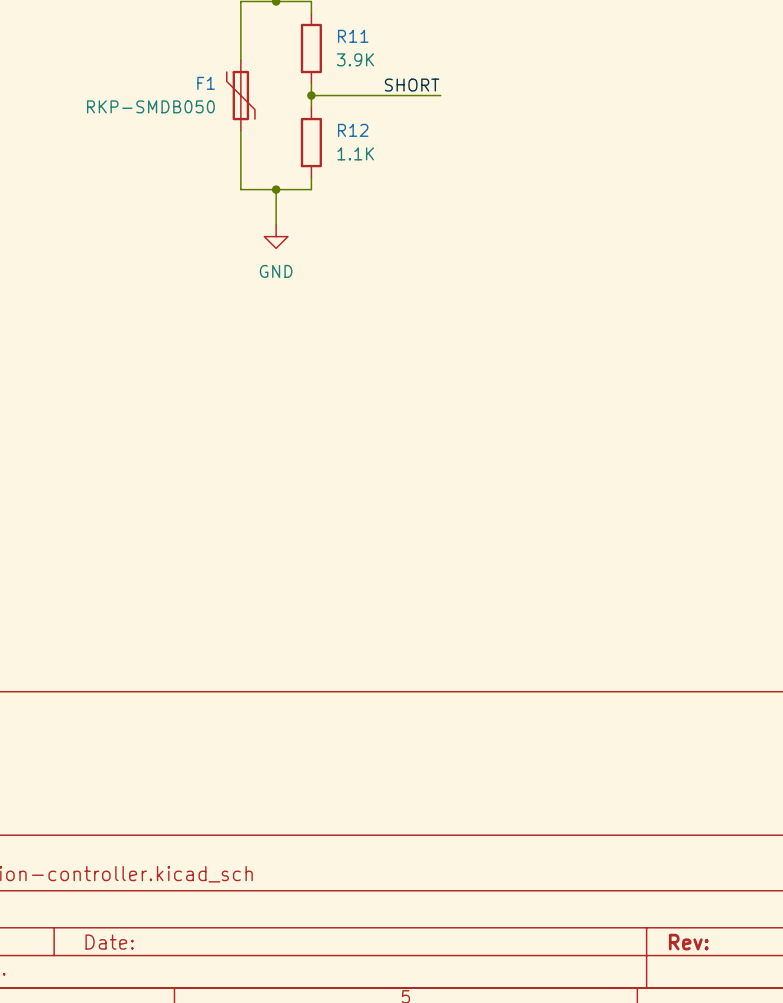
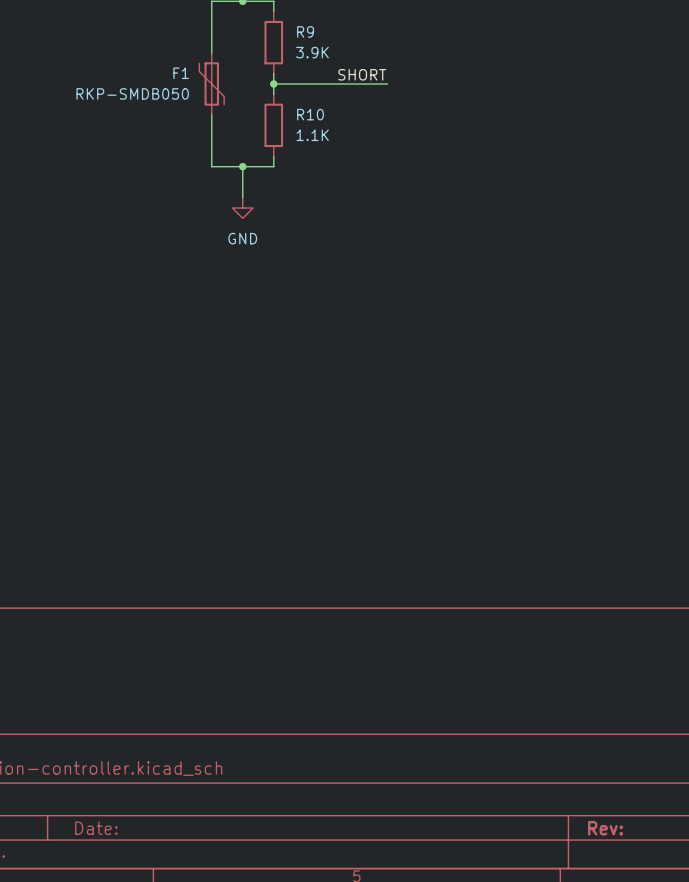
R11 name: R11 (353, 36) -> R9 (305, 31)
R12 name: R12 (353, 130) -> R10 (310, 114)

